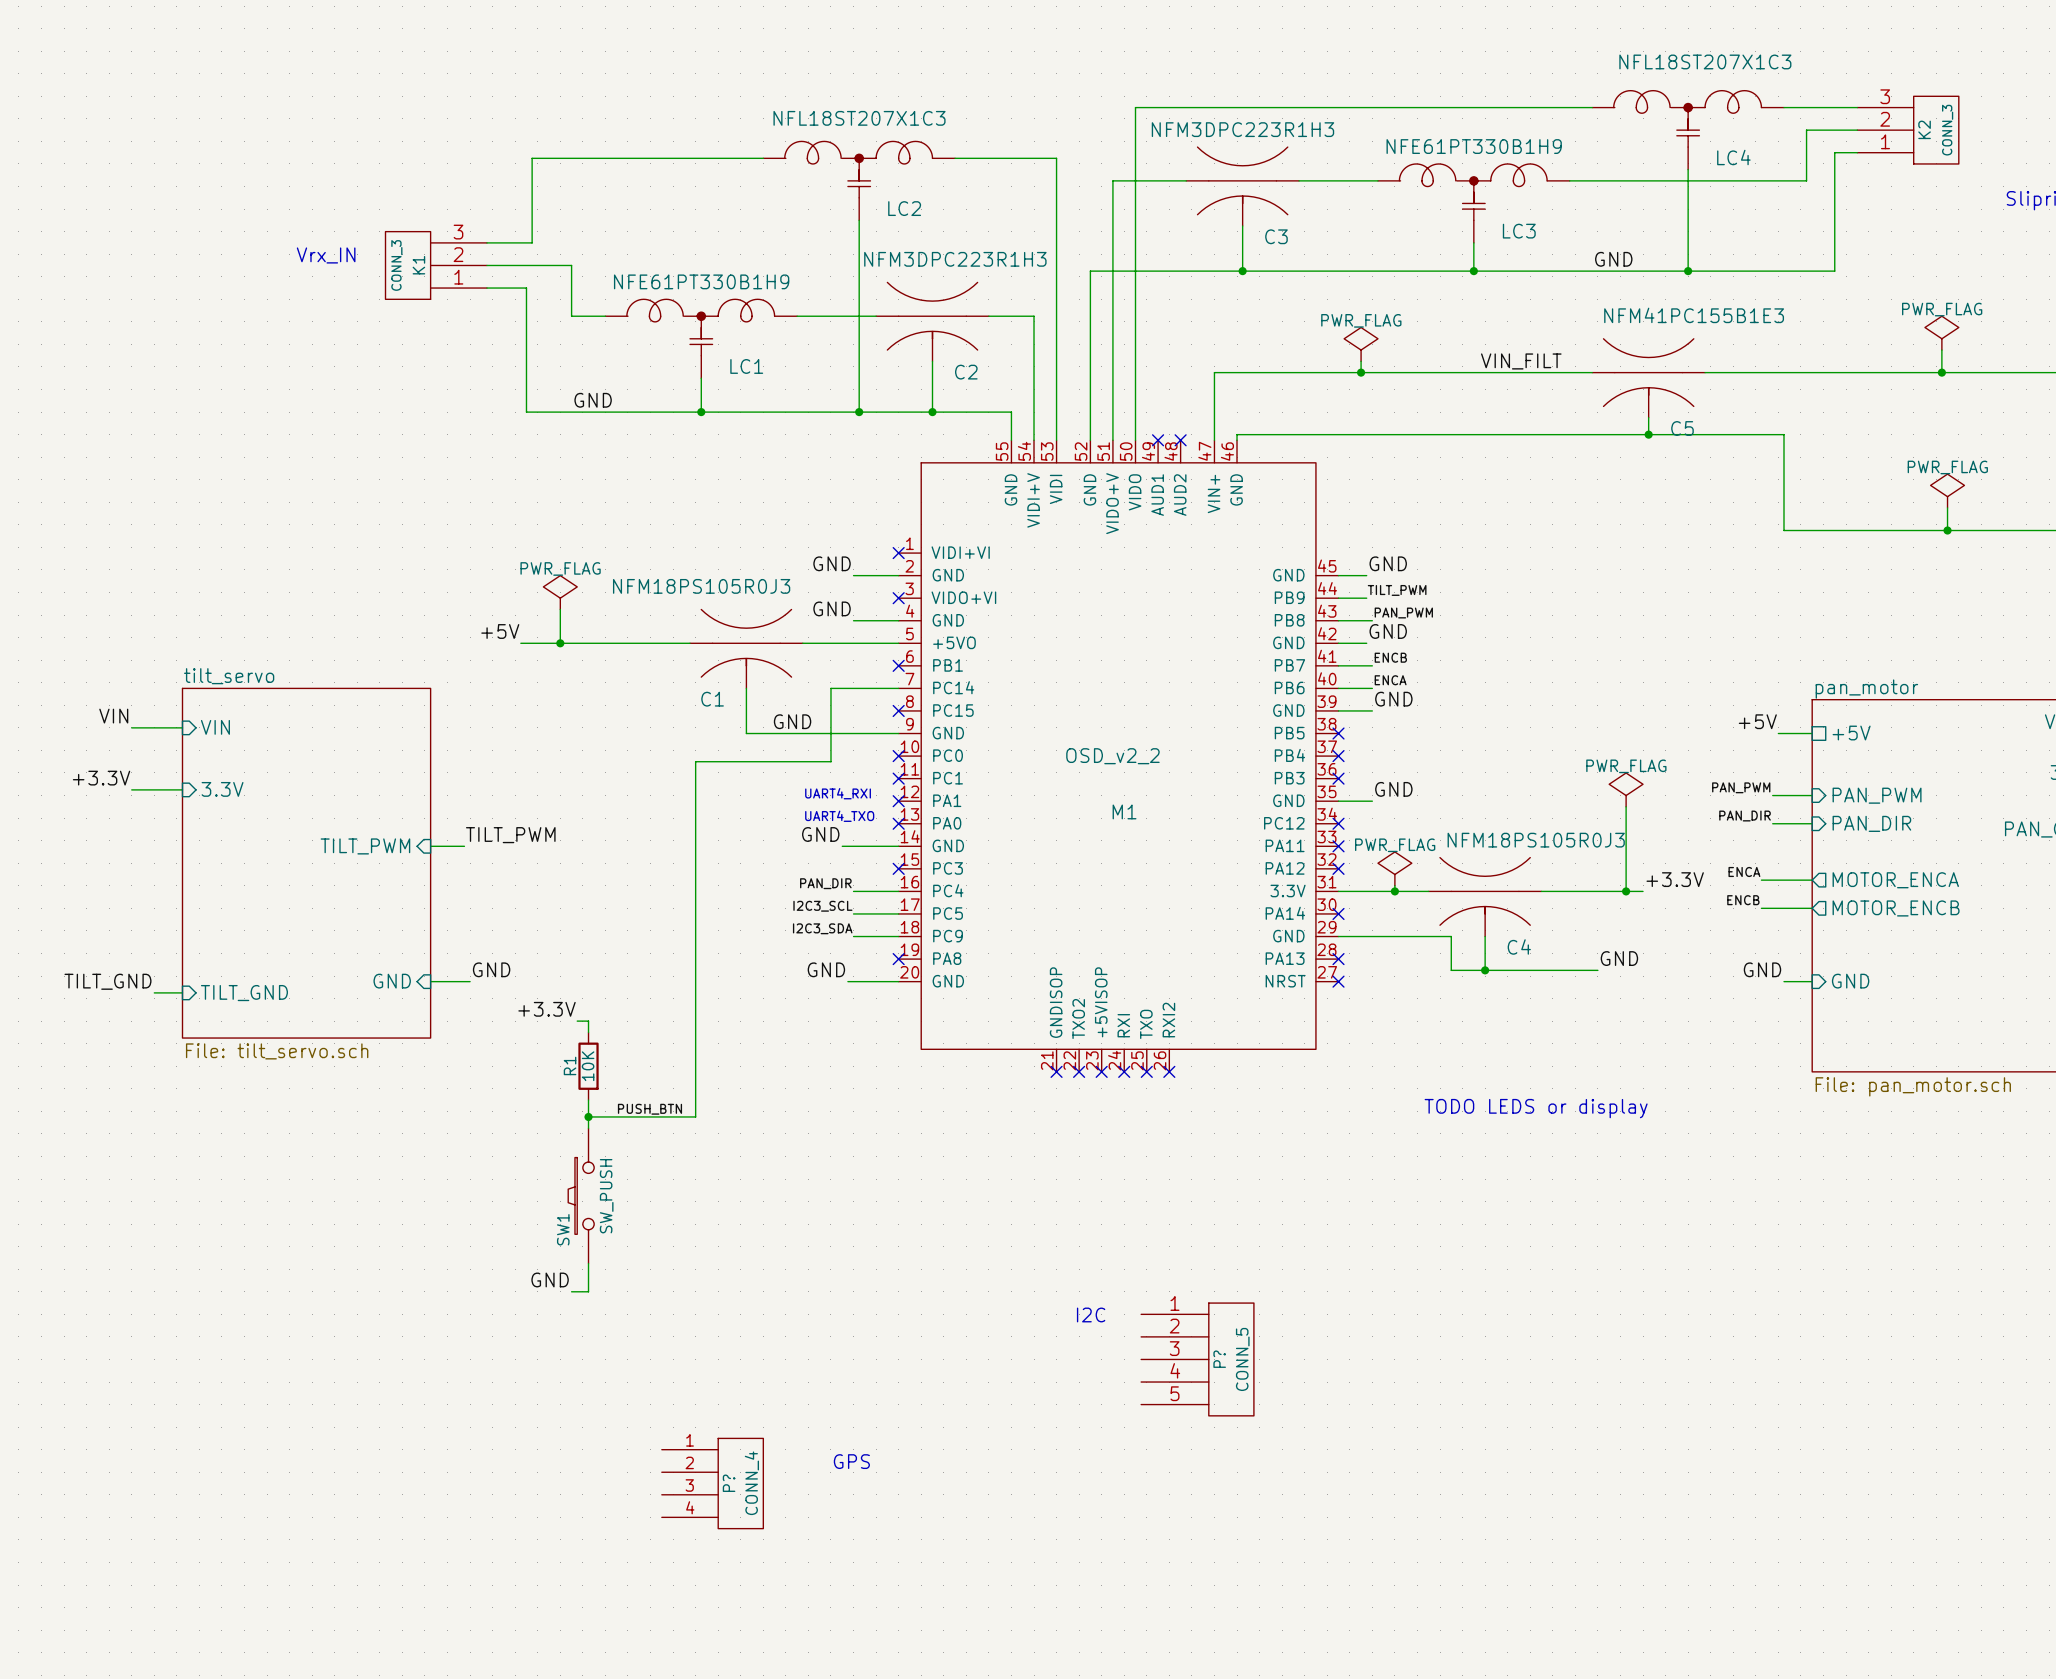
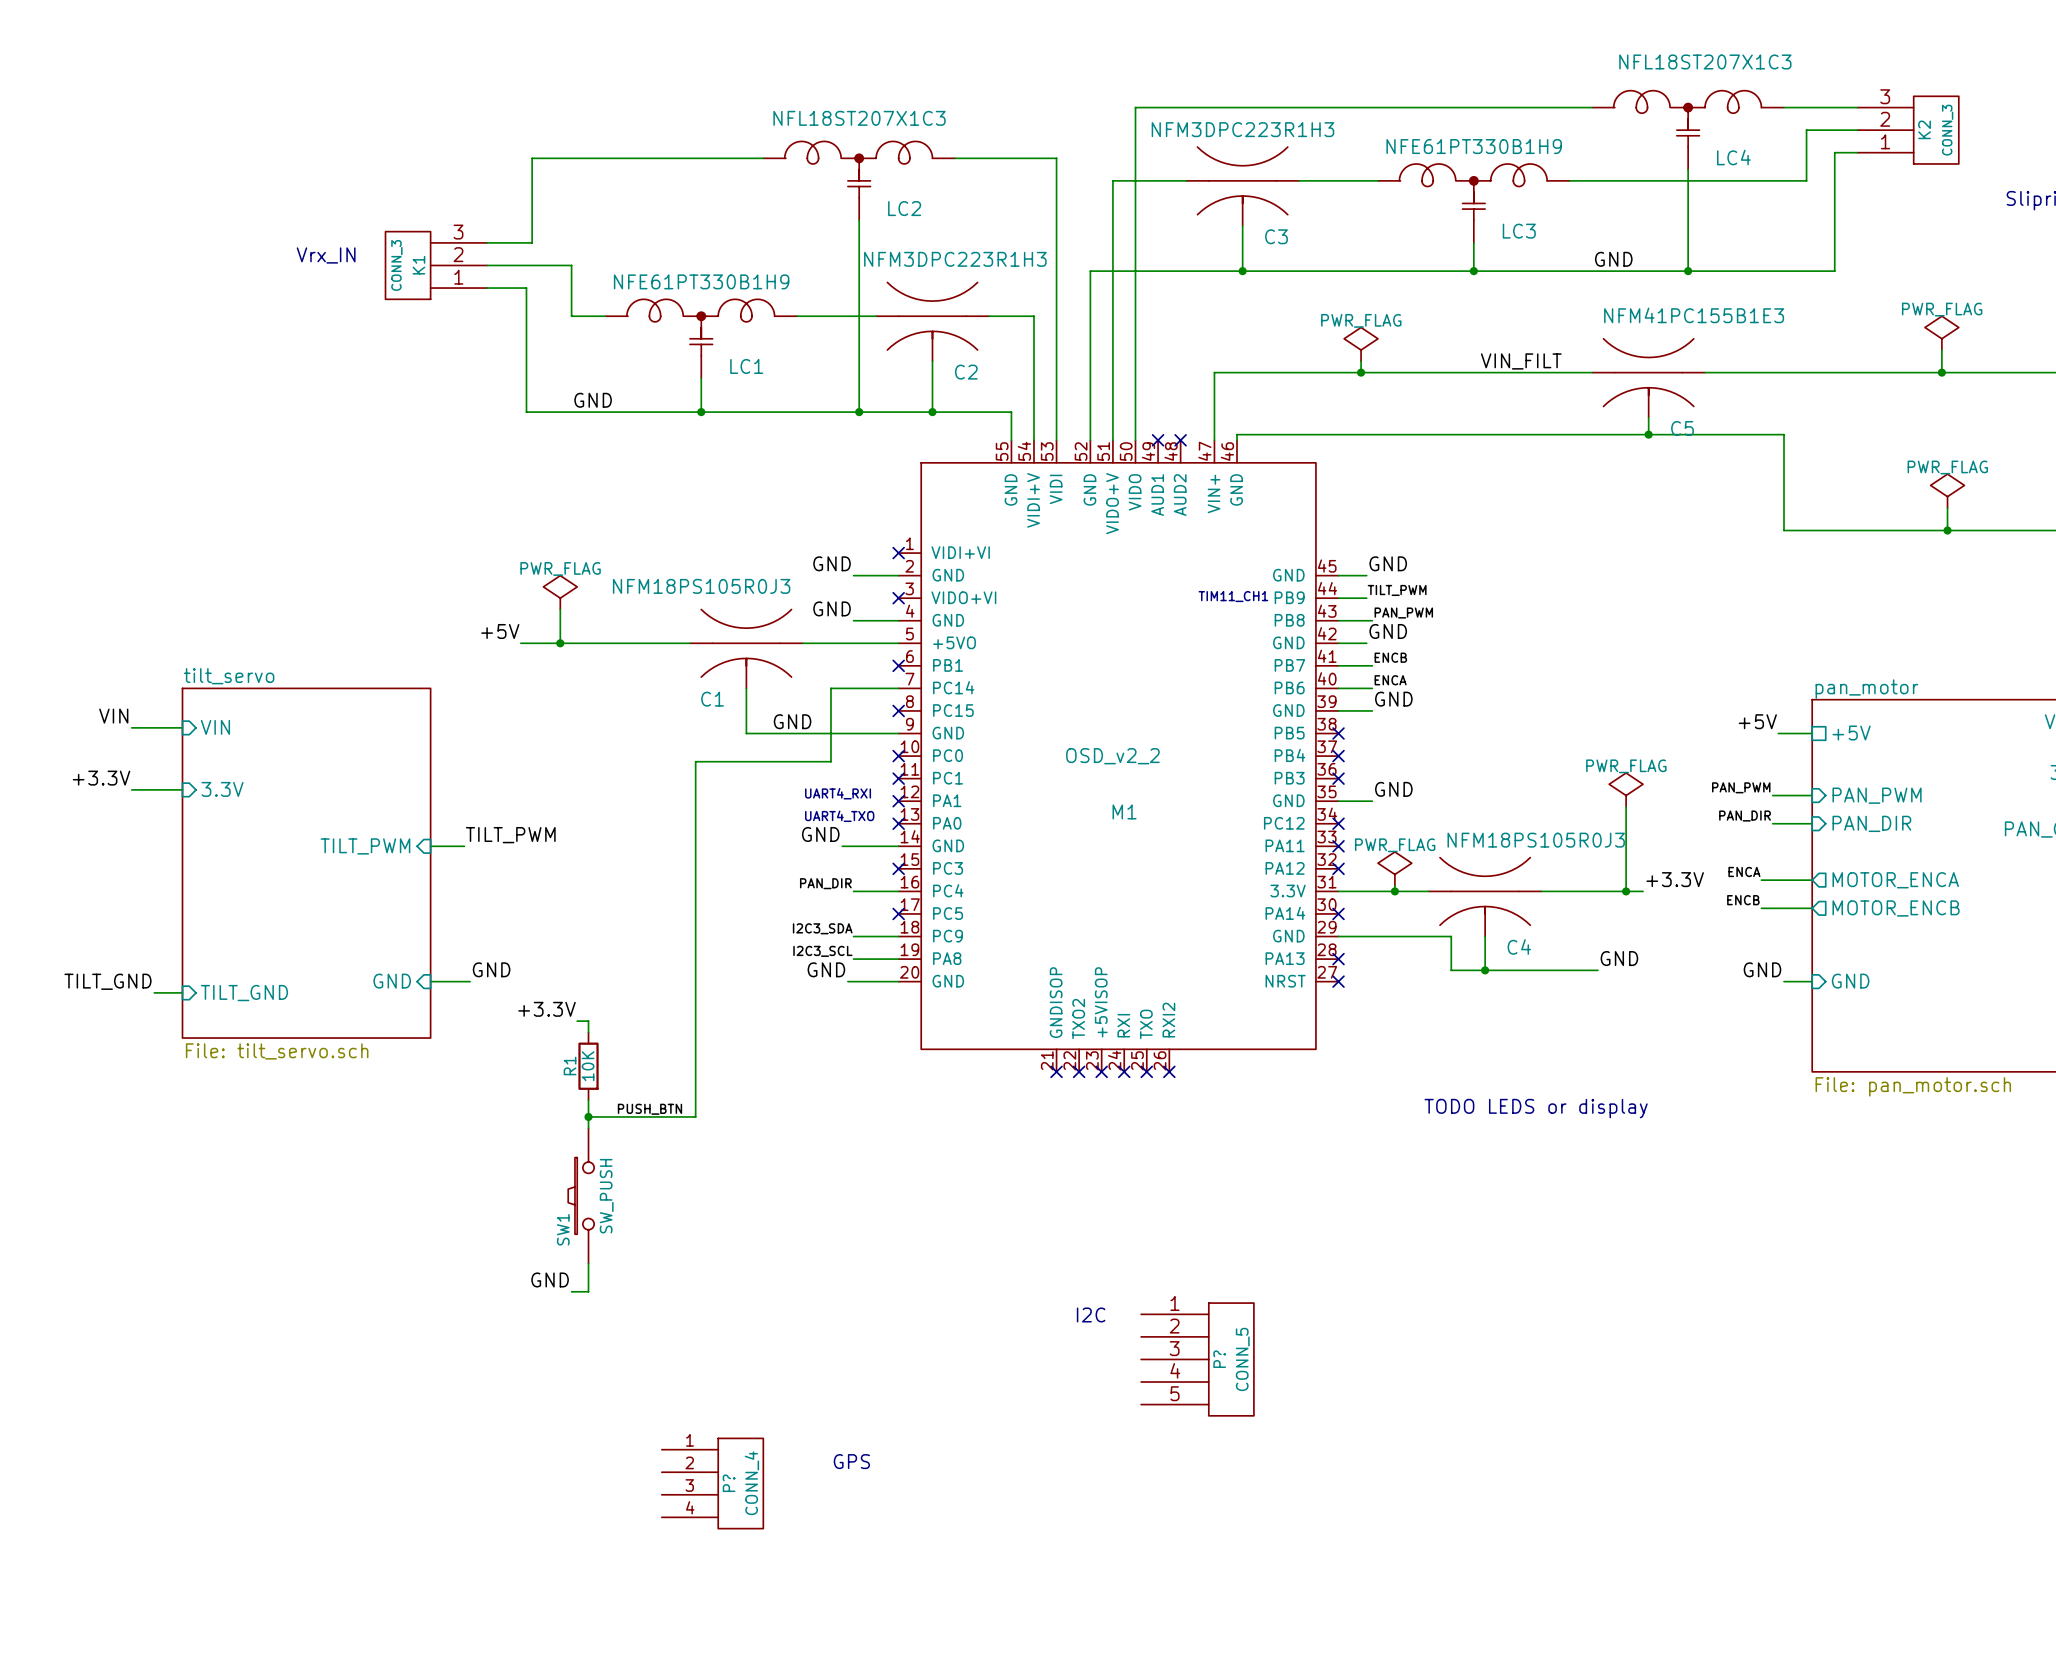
text: none -> TIM11_CH1 (1233, 596)
label position: I2C3_SCL (822, 906) -> I2C3_SCL (822, 951)
wire: (853, 913) (898, 913) -> (853, 959) (898, 959)
no-connect mark position: (898, 959) -> (898, 913)

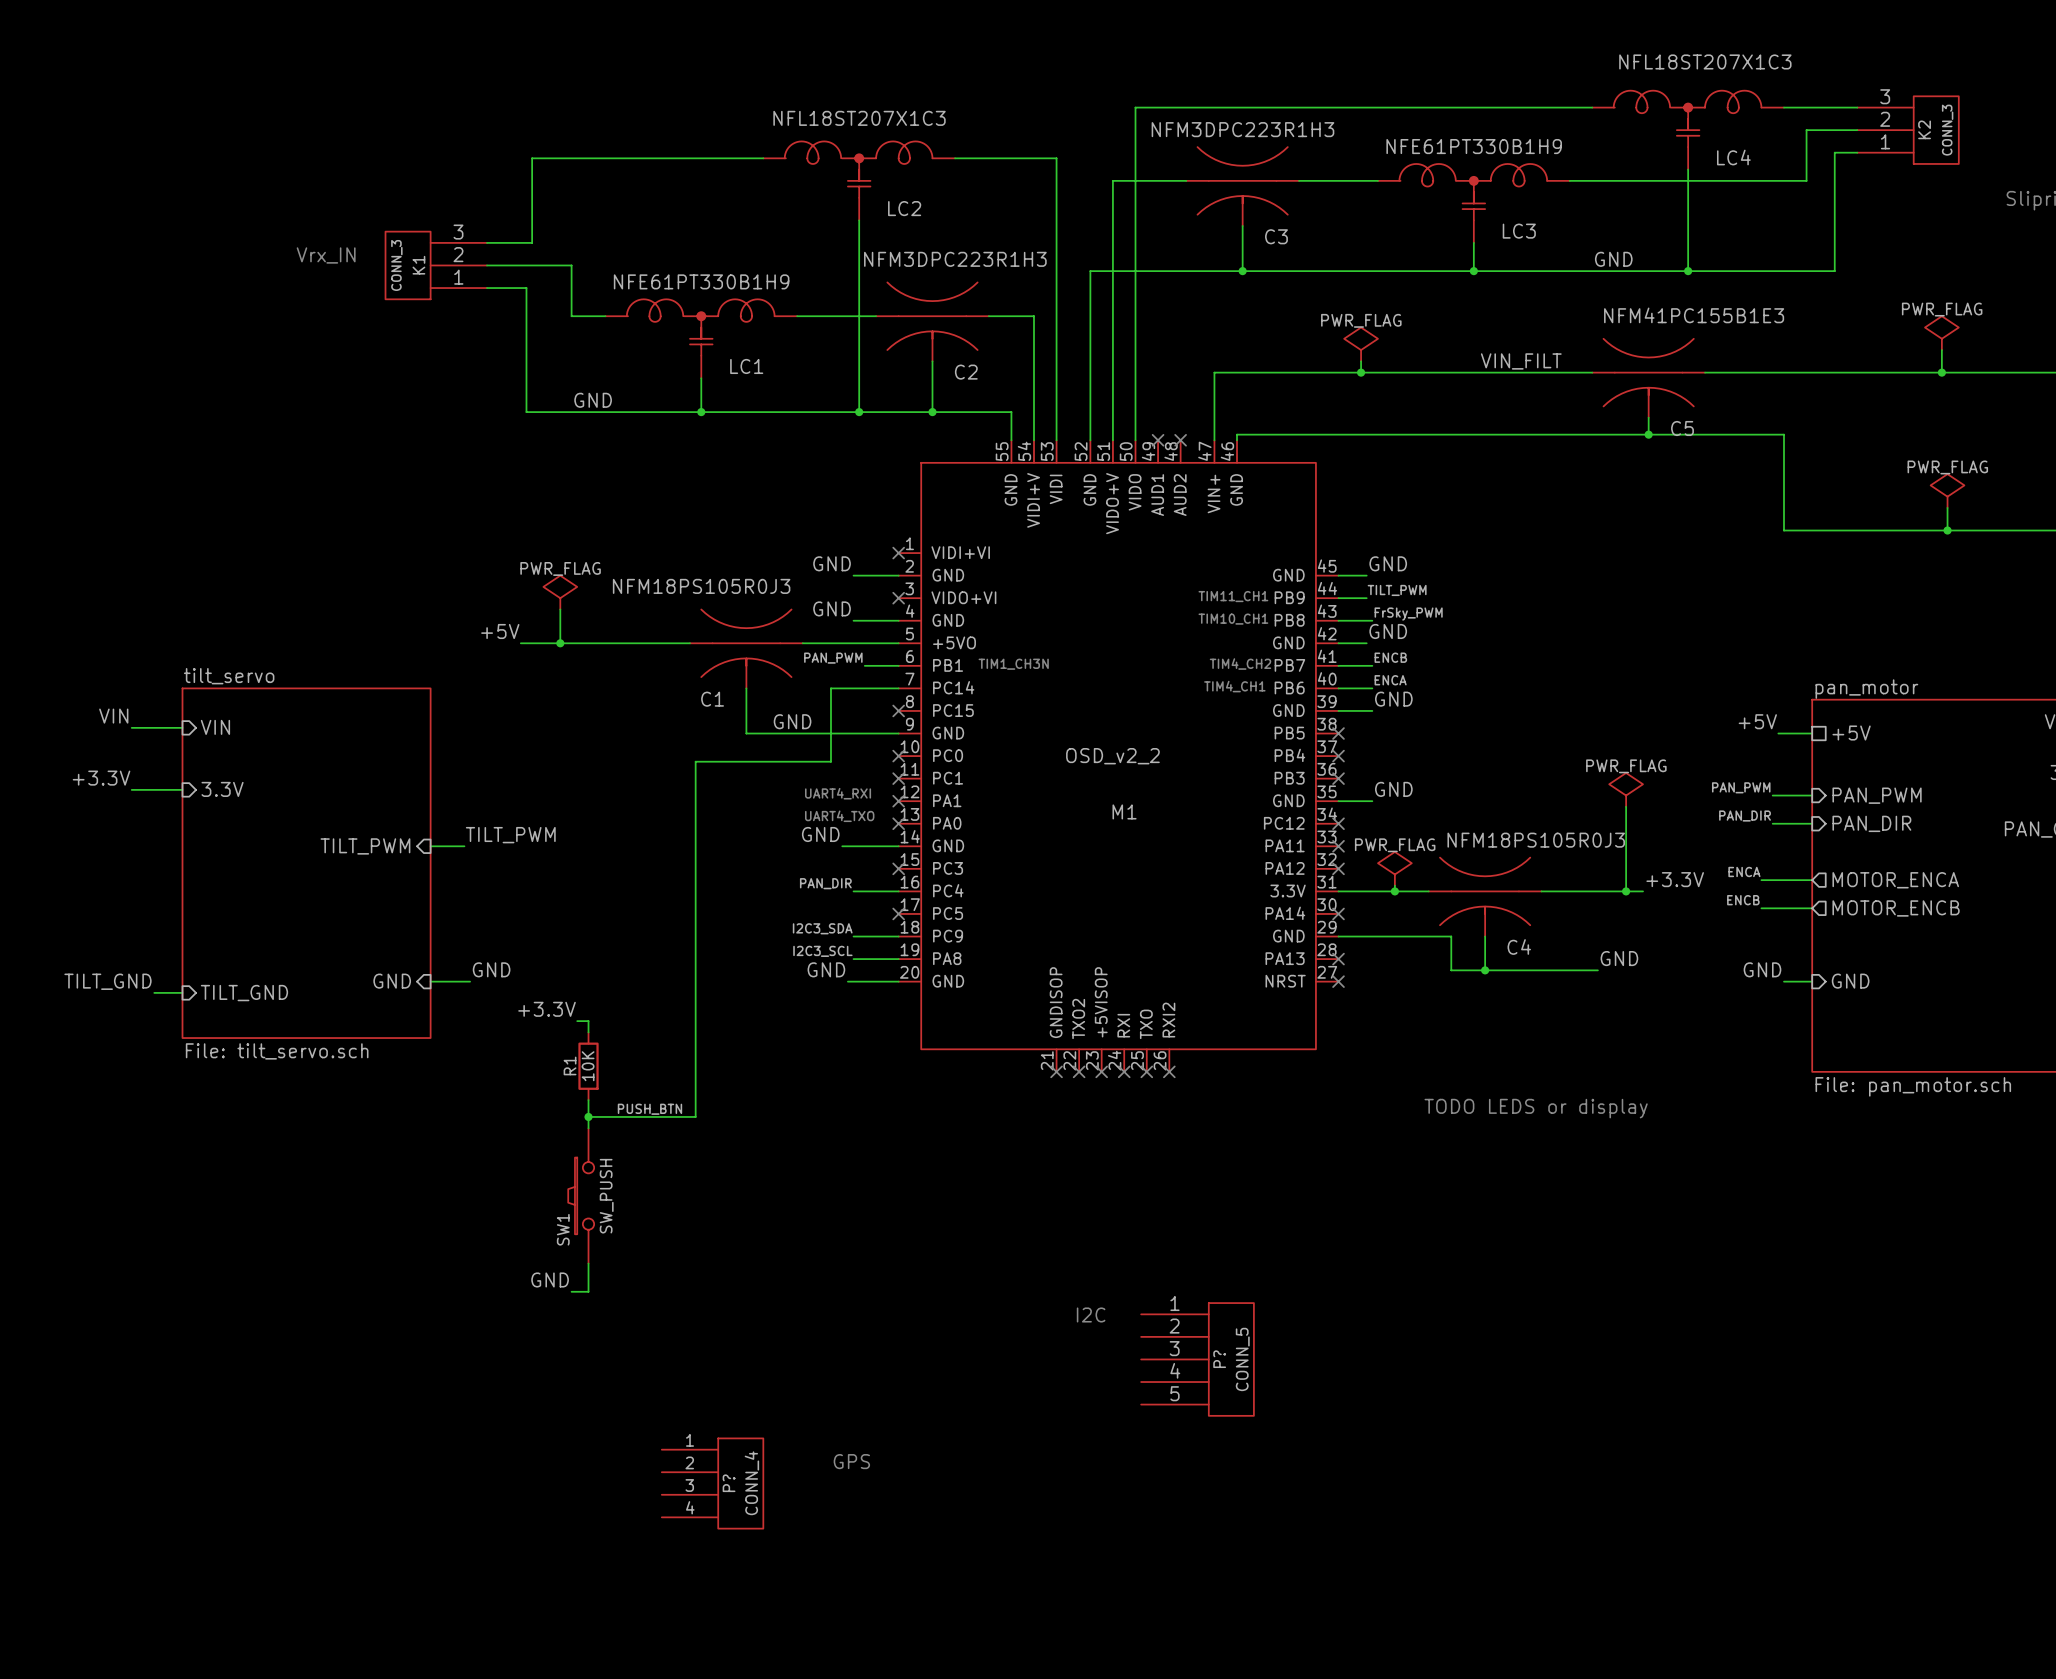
label: PAN_PWM (1403, 613) -> FrSky_PWM (1408, 614)
text: none -> TIM10_CH1 (1233, 619)
label: none -> PAN_PWM (833, 658)
text: none -> TIM1_CH3N (1013, 664)
text: none -> TIM4_CH2 (1240, 664)
wire: none -> (864, 665) (898, 665)
no-connect mark: (898, 665) -> none
text: none -> TIM4_CH1 (1234, 686)

